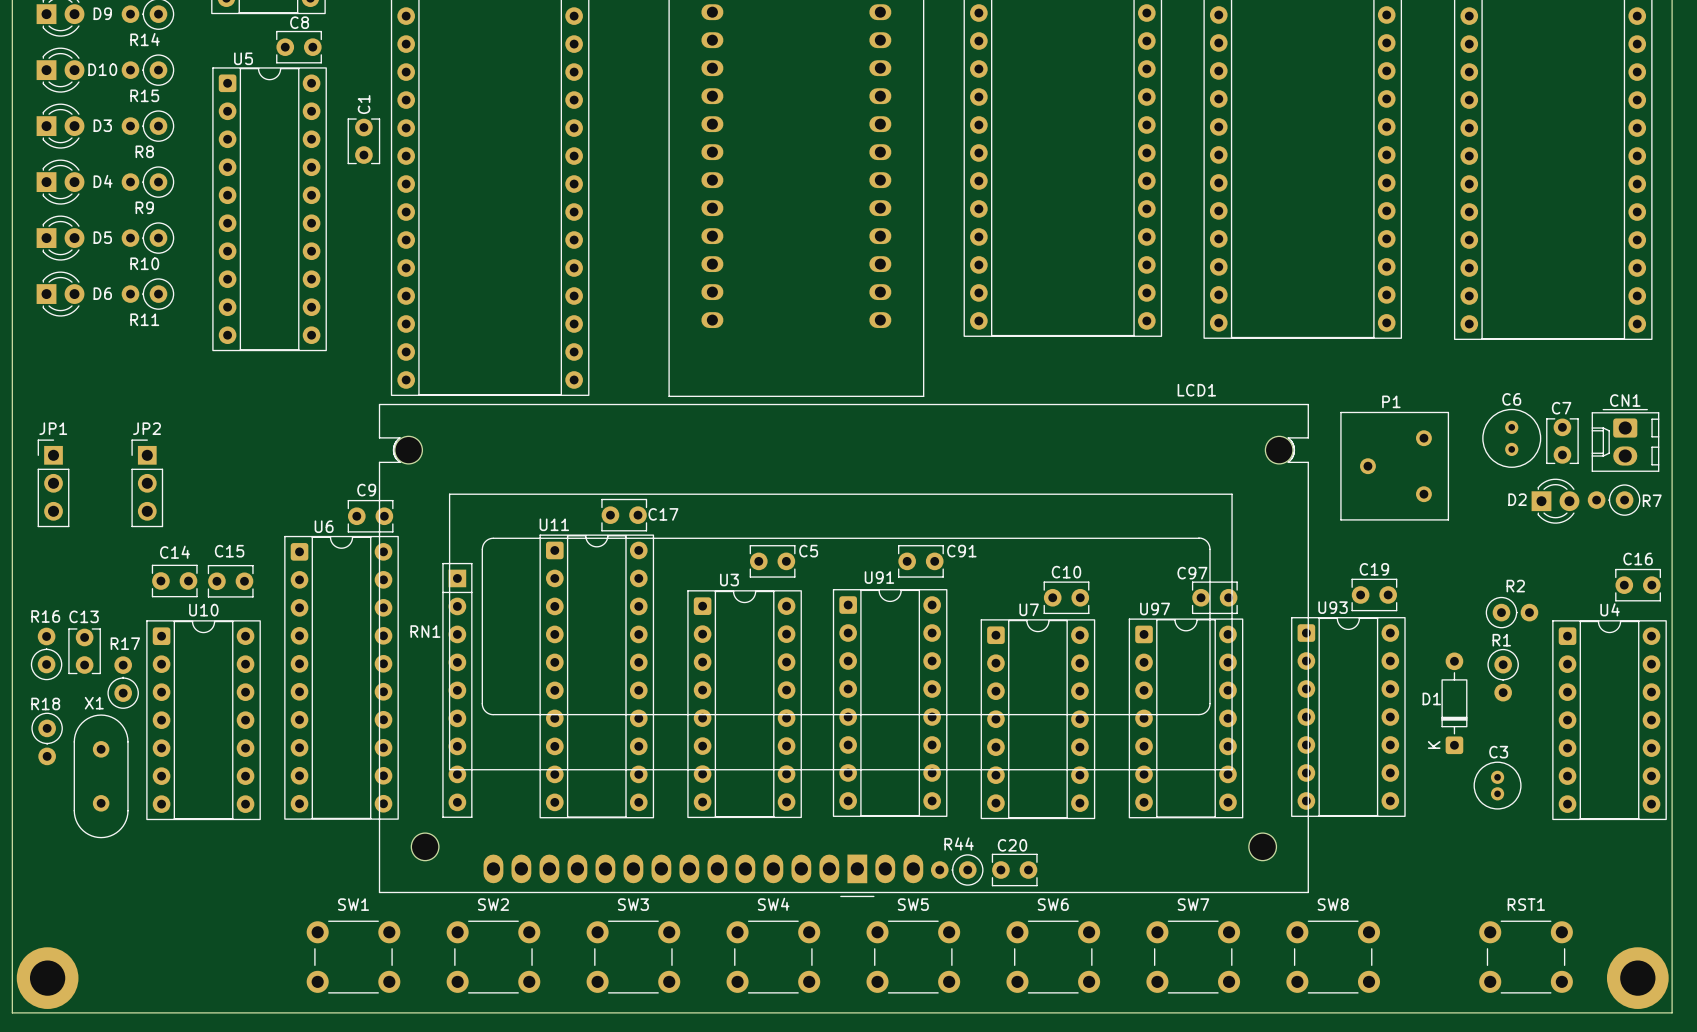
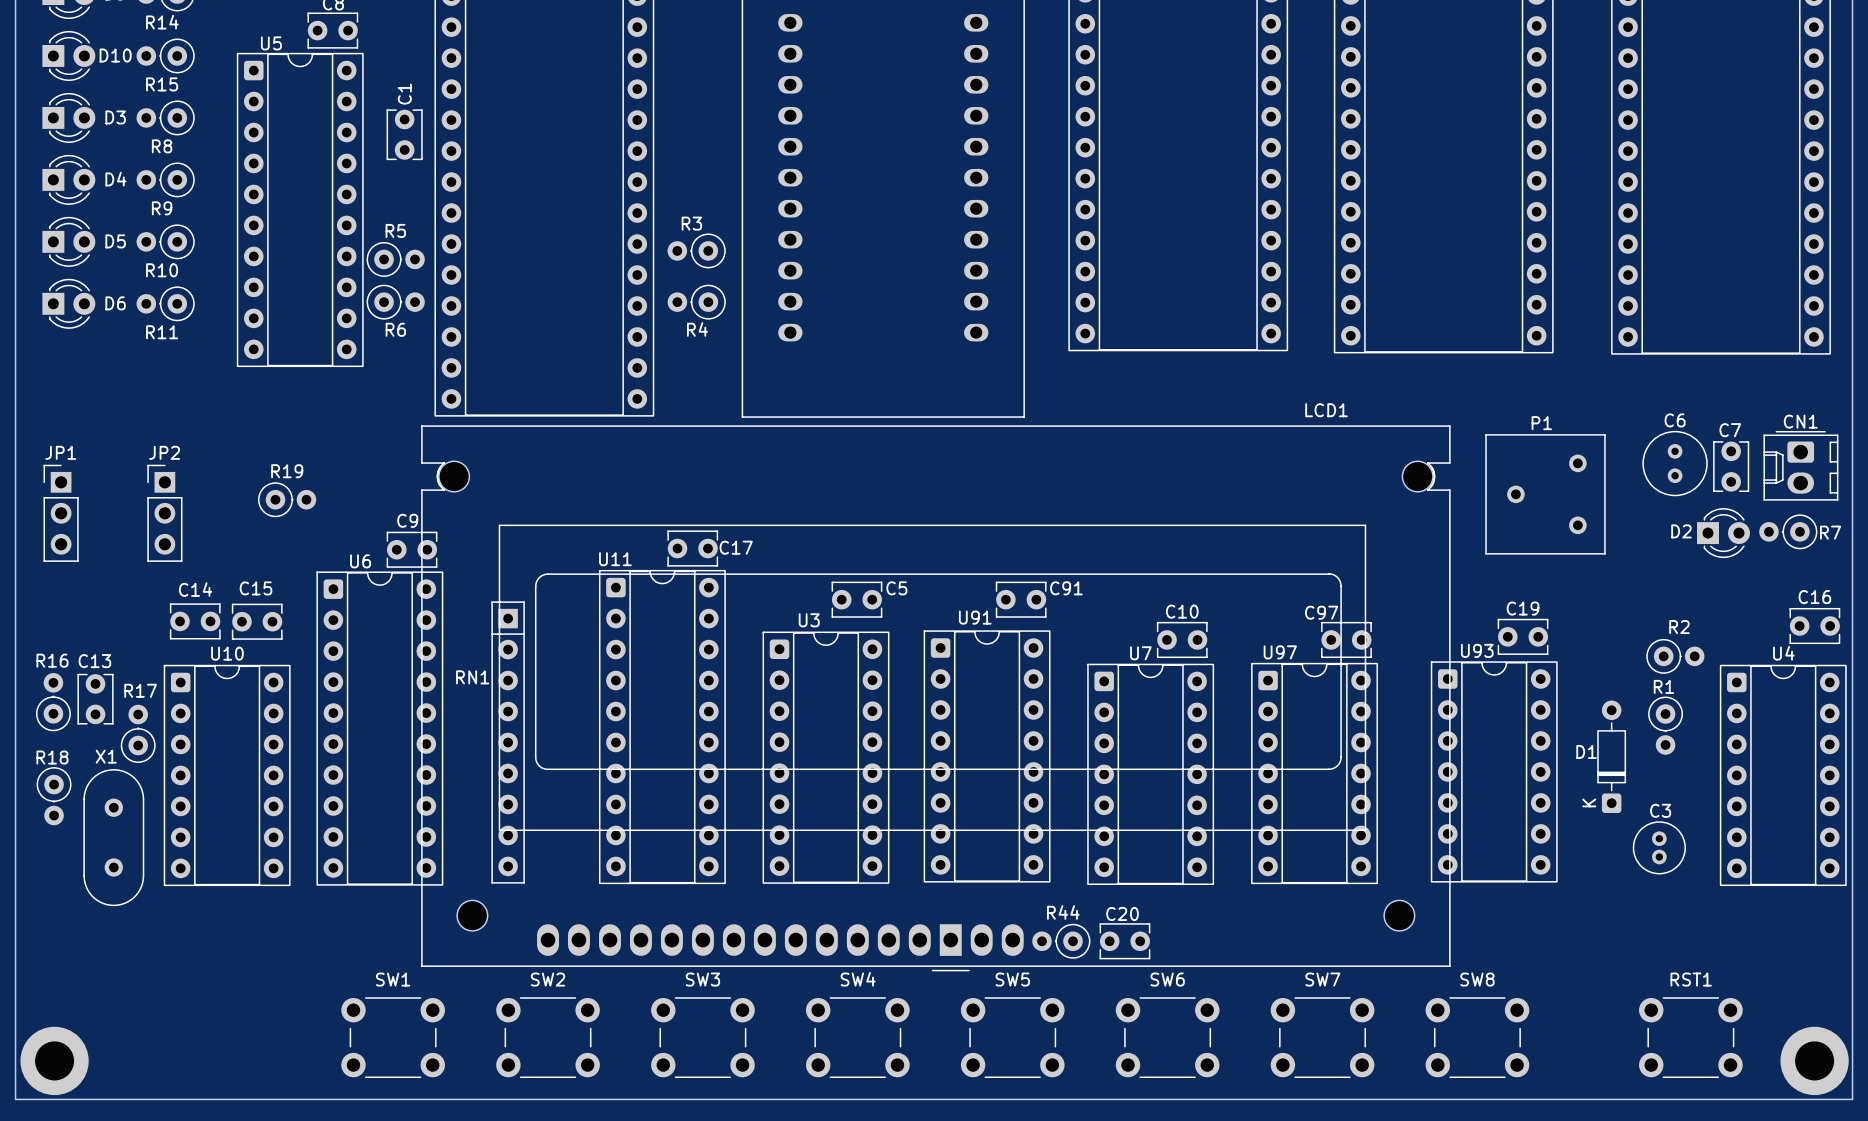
R3: none -> (696, 250)
R5: none -> (395, 259)
R6: none -> (395, 302)
R4: none -> (696, 302)
R19: none -> (287, 499)

